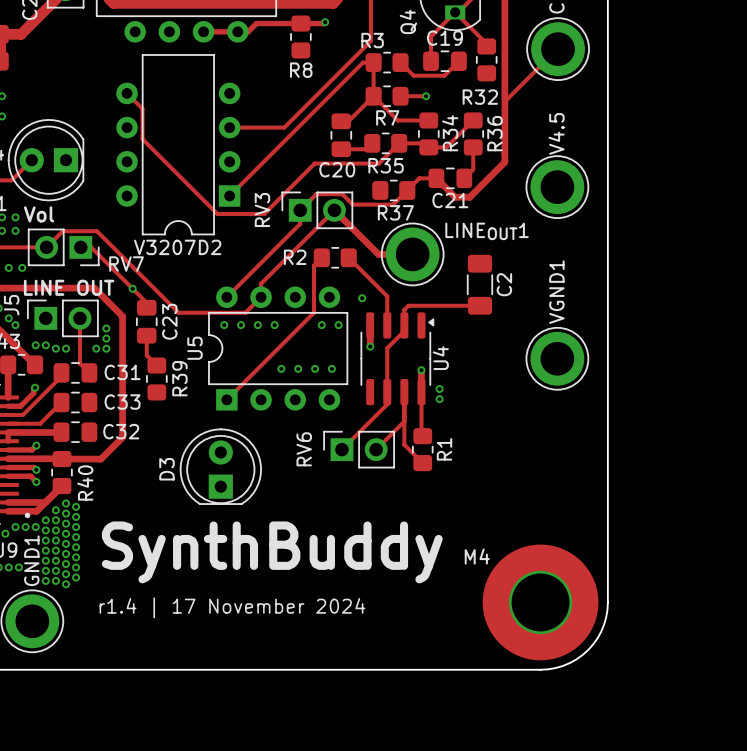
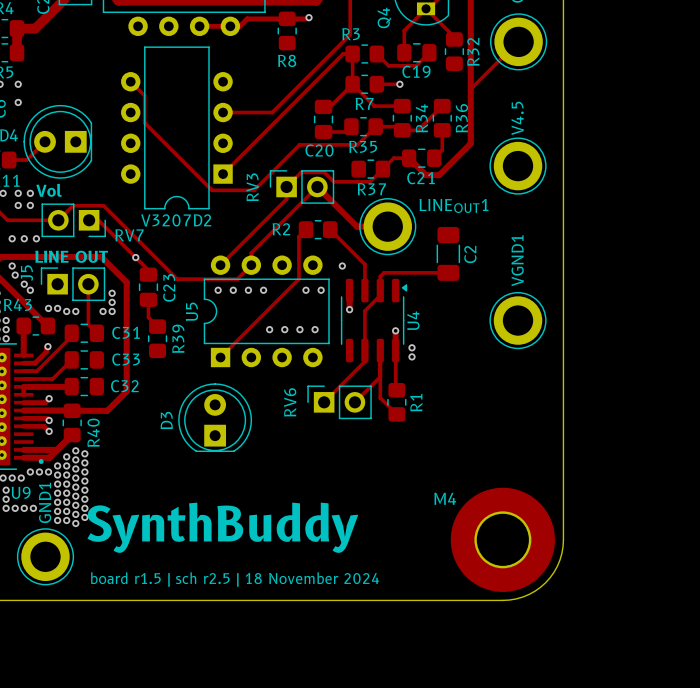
C19 name position: C19 (444, 38) -> C19 (416, 71)
R32 name rotation: 0° (480, 97) -> 90° counterclockwise (473, 51)
R32 name position: R32 (480, 97) -> R32 (473, 51)
text position: SynthBuddy (272, 552) -> SynthBuddy (222, 527)
text: r1.4 | 17 November 2024 (232, 607) -> none
text: none -> board r1.5 | sch r2.5 | 18 November 2024 (235, 579)

